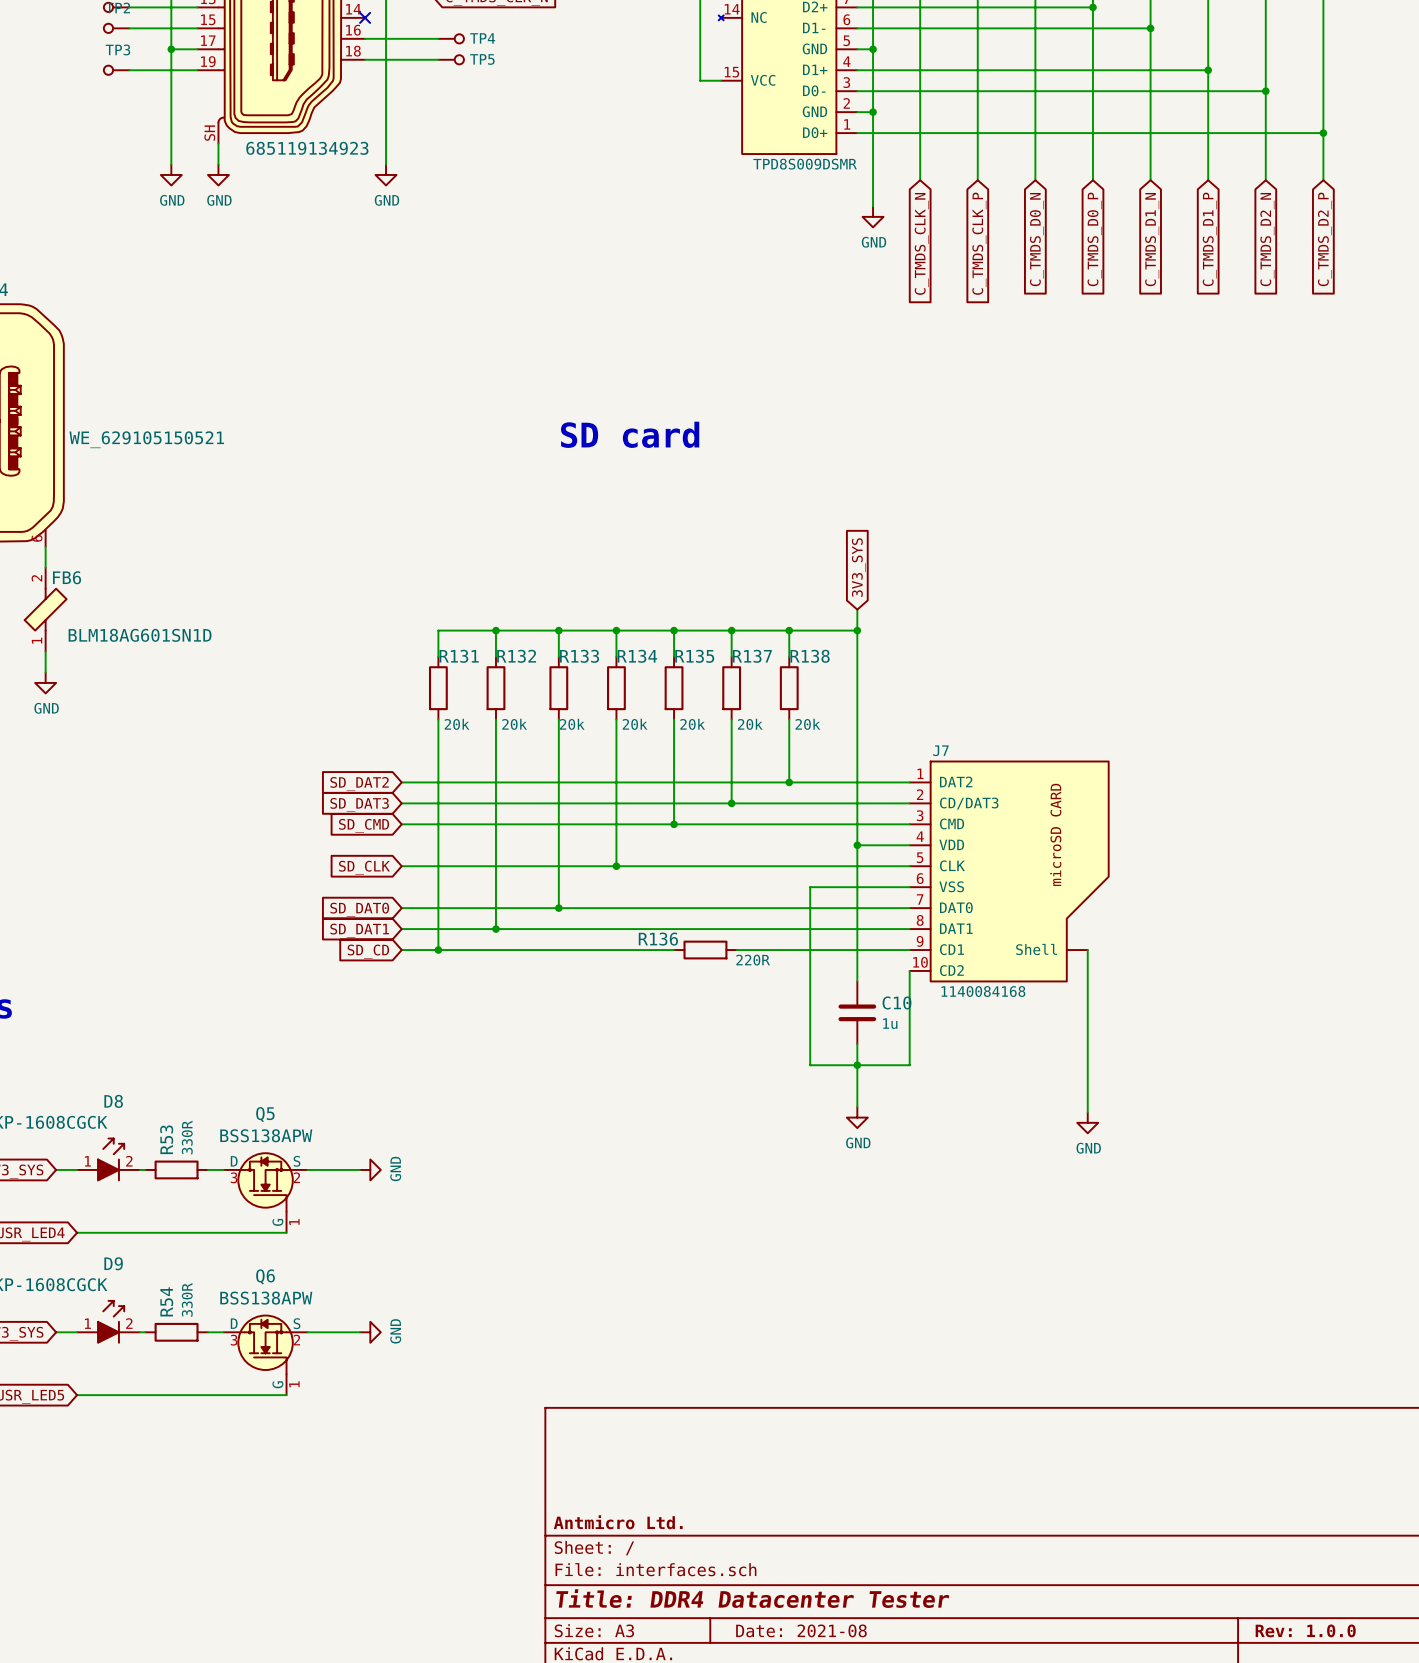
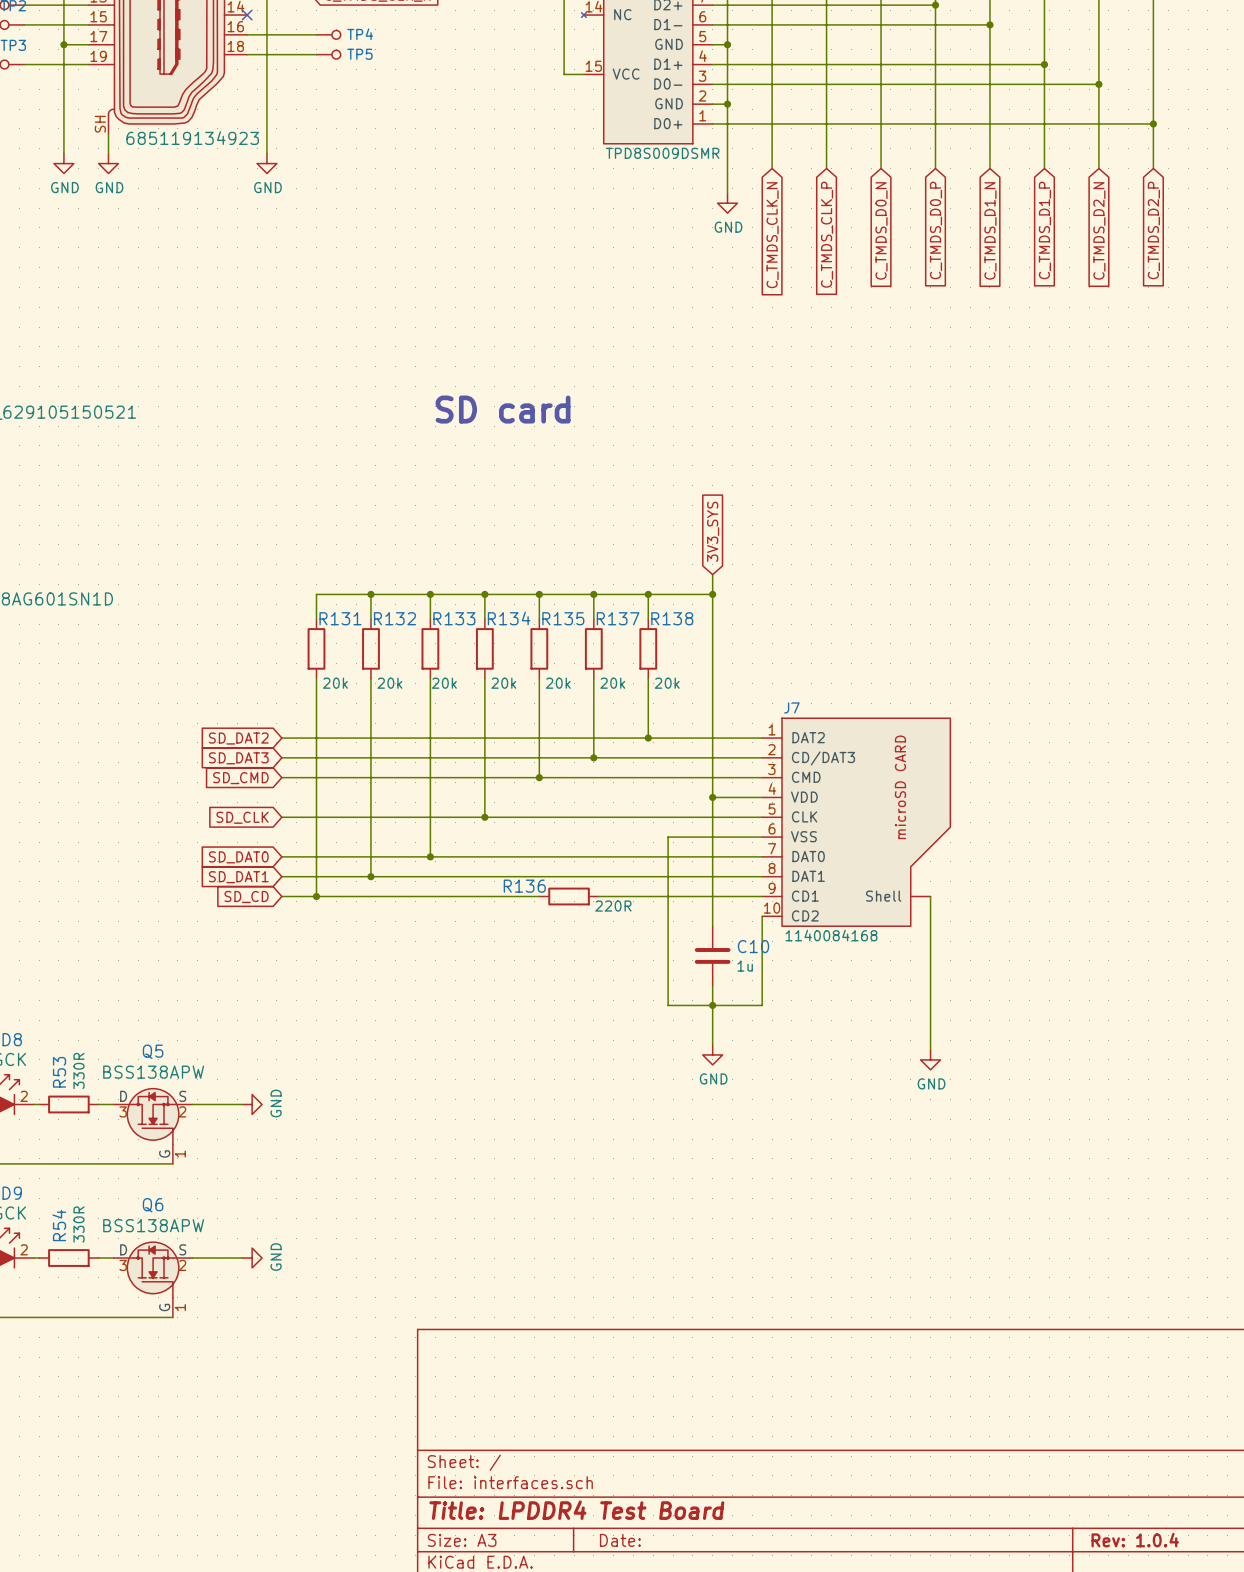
title block: Antmicro Ltd. (618, 1522) -> none
title block: Title: DDR4 Datacenter Tester (752, 1598) -> Title: LPDDR4 Test Board (576, 1510)
title block: Date: 2021-08 (801, 1630) -> Date: (620, 1540)
title block: Rev: 1.0.0 (1305, 1630) -> Rev: 1.0.4 (1135, 1540)

